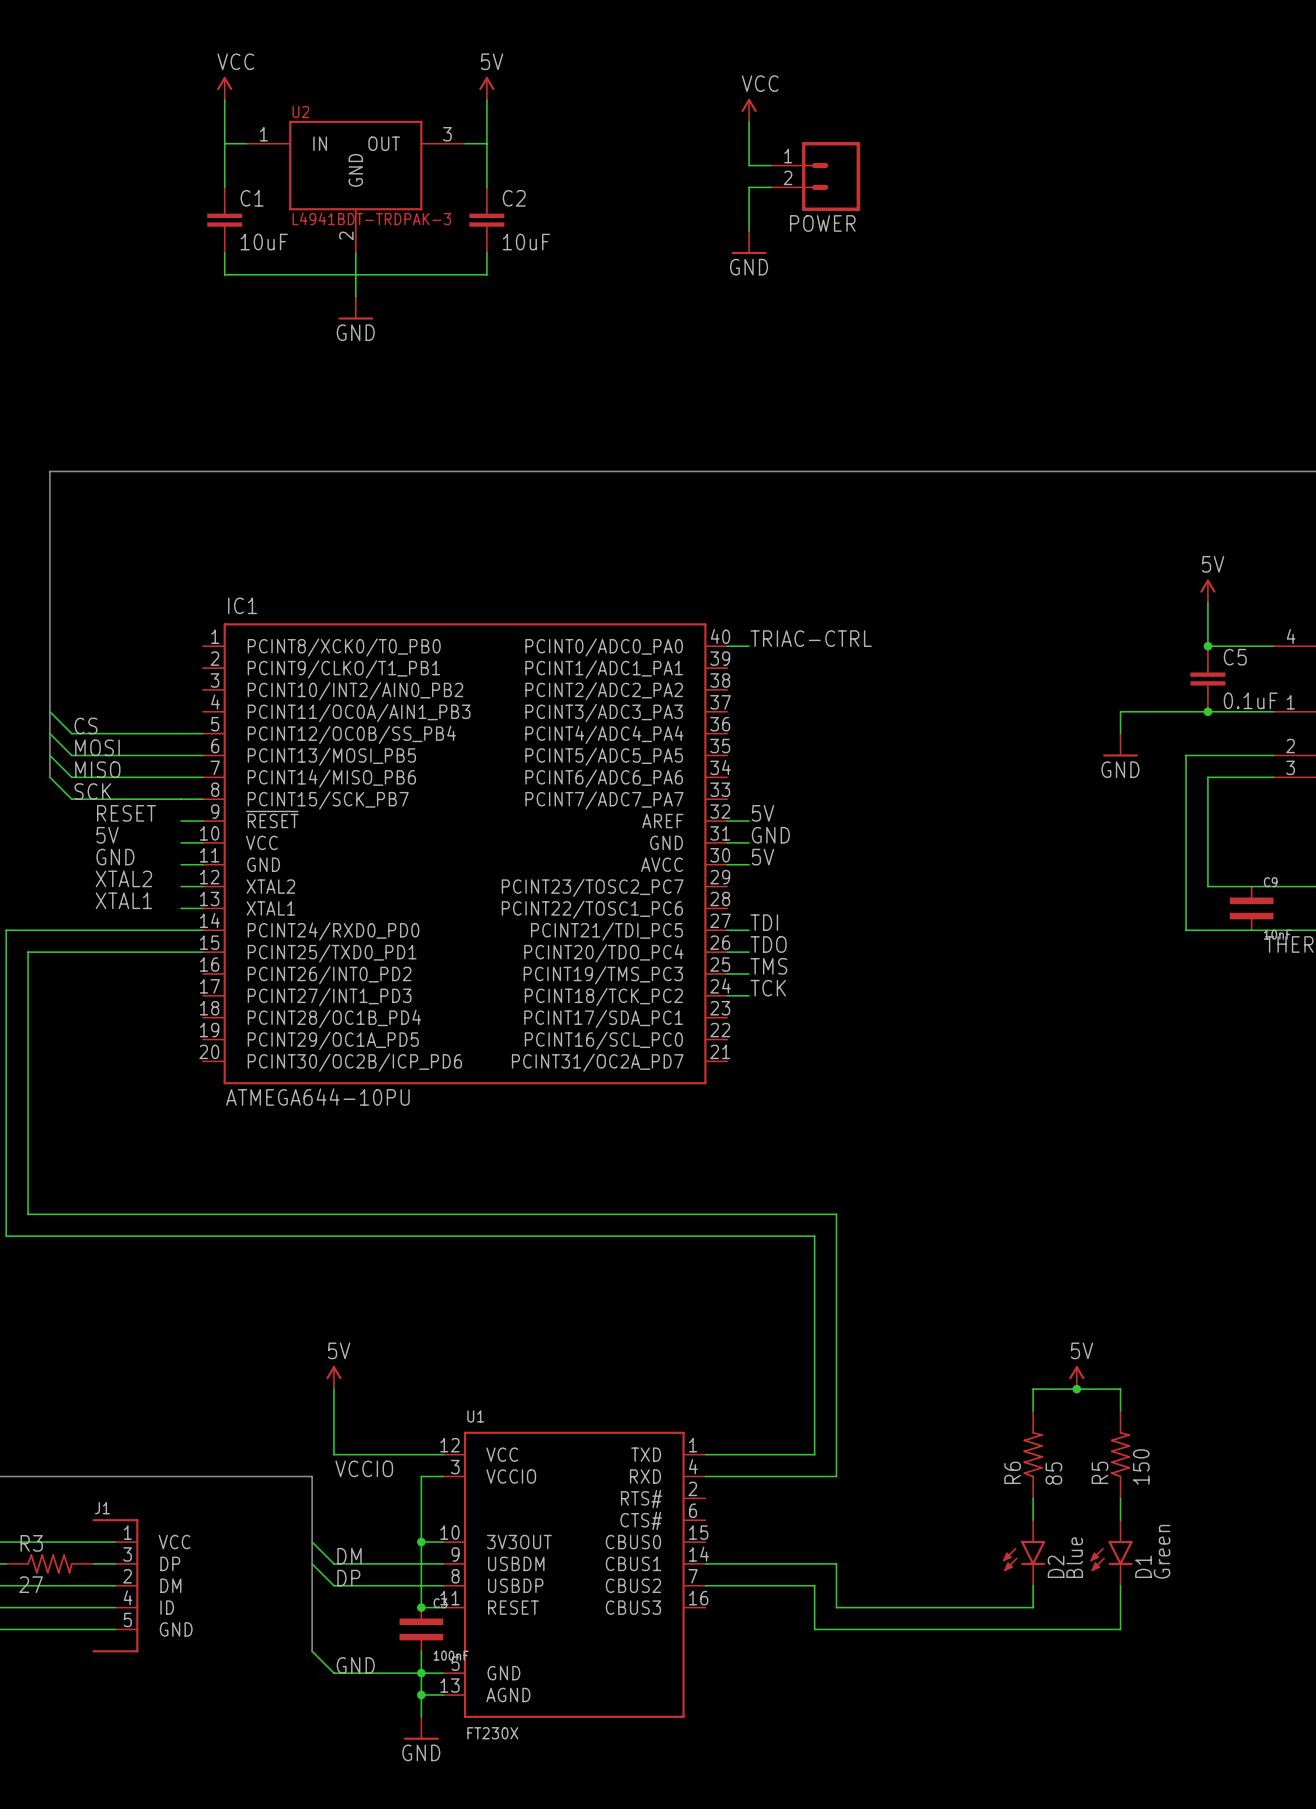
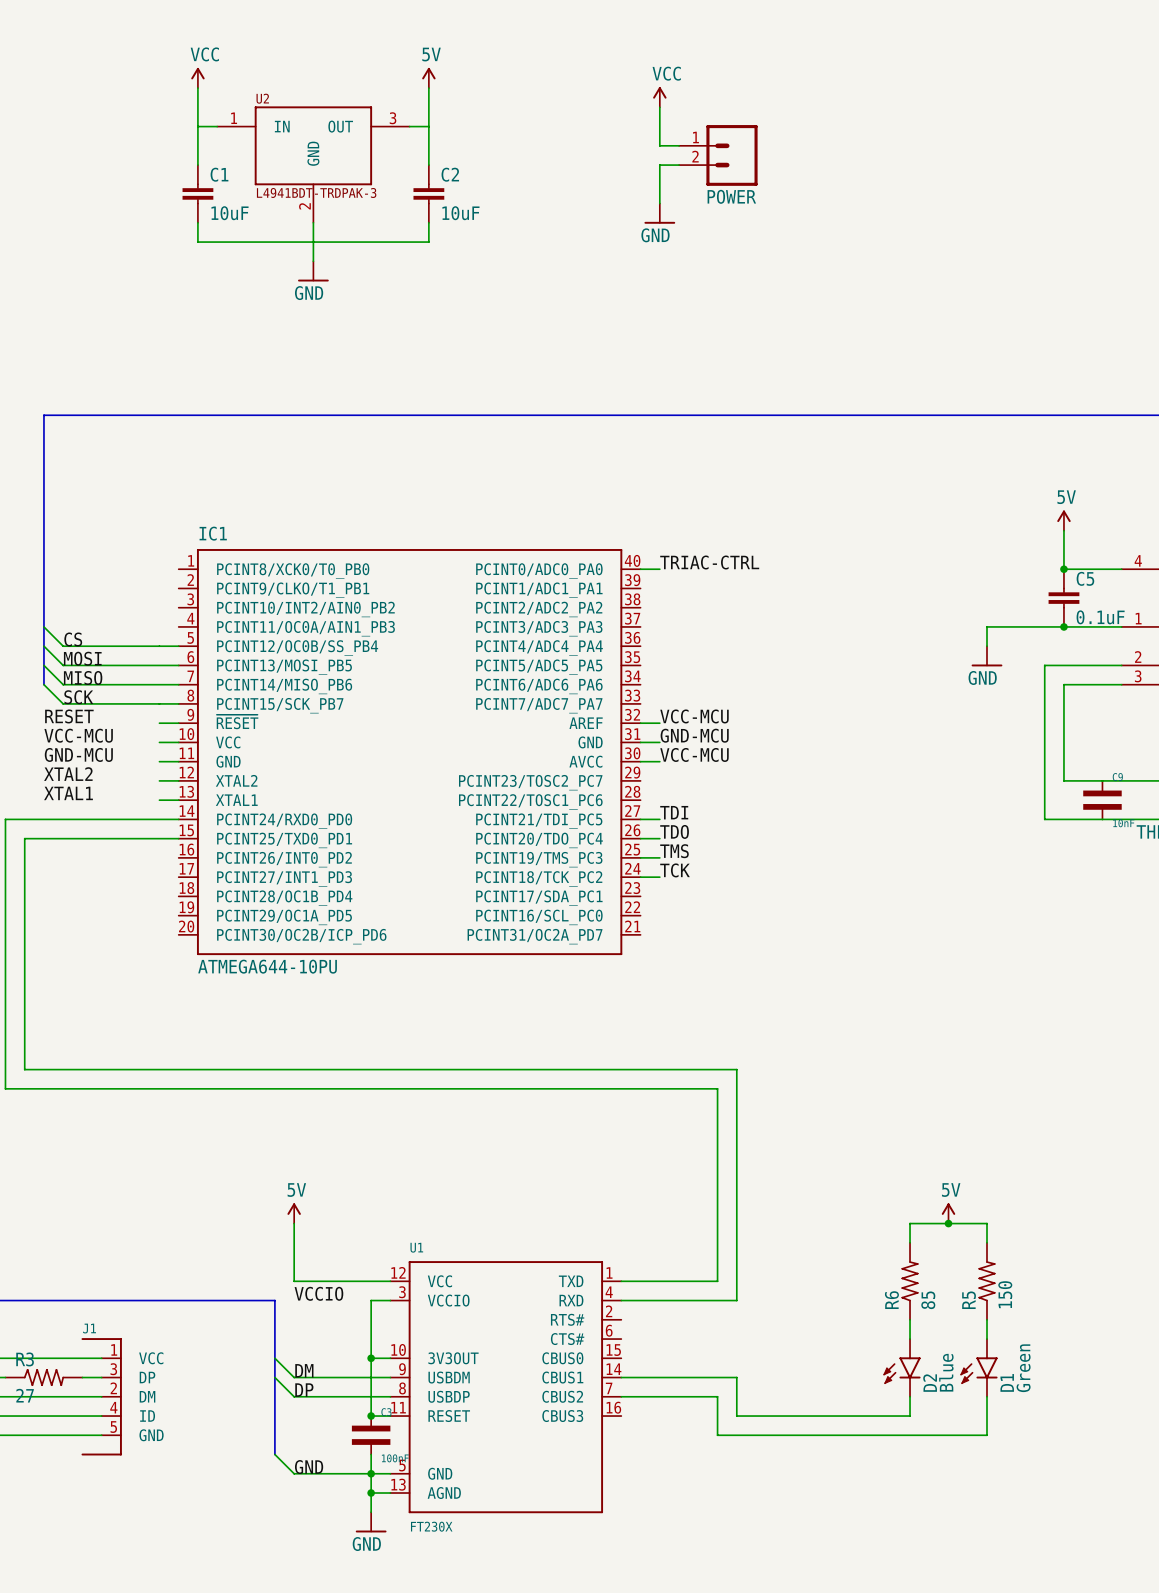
label position: RESET (126, 813) -> RESET (69, 716)
label: 5V (763, 813) -> VCC-MCU (694, 716)
label: none -> VCC-MCU (78, 735)
label: 5V (107, 835) -> none
label: GND (770, 835) -> GND-MCU (694, 735)
label: none -> GND-MCU (78, 754)
label: GND (115, 857) -> none
label: 5V (763, 857) -> VCC-MCU (694, 754)
label position: XTAL2 (123, 878) -> XTAL2 (68, 774)
label position: XTAL1 (123, 900) -> XTAL1 (68, 793)

